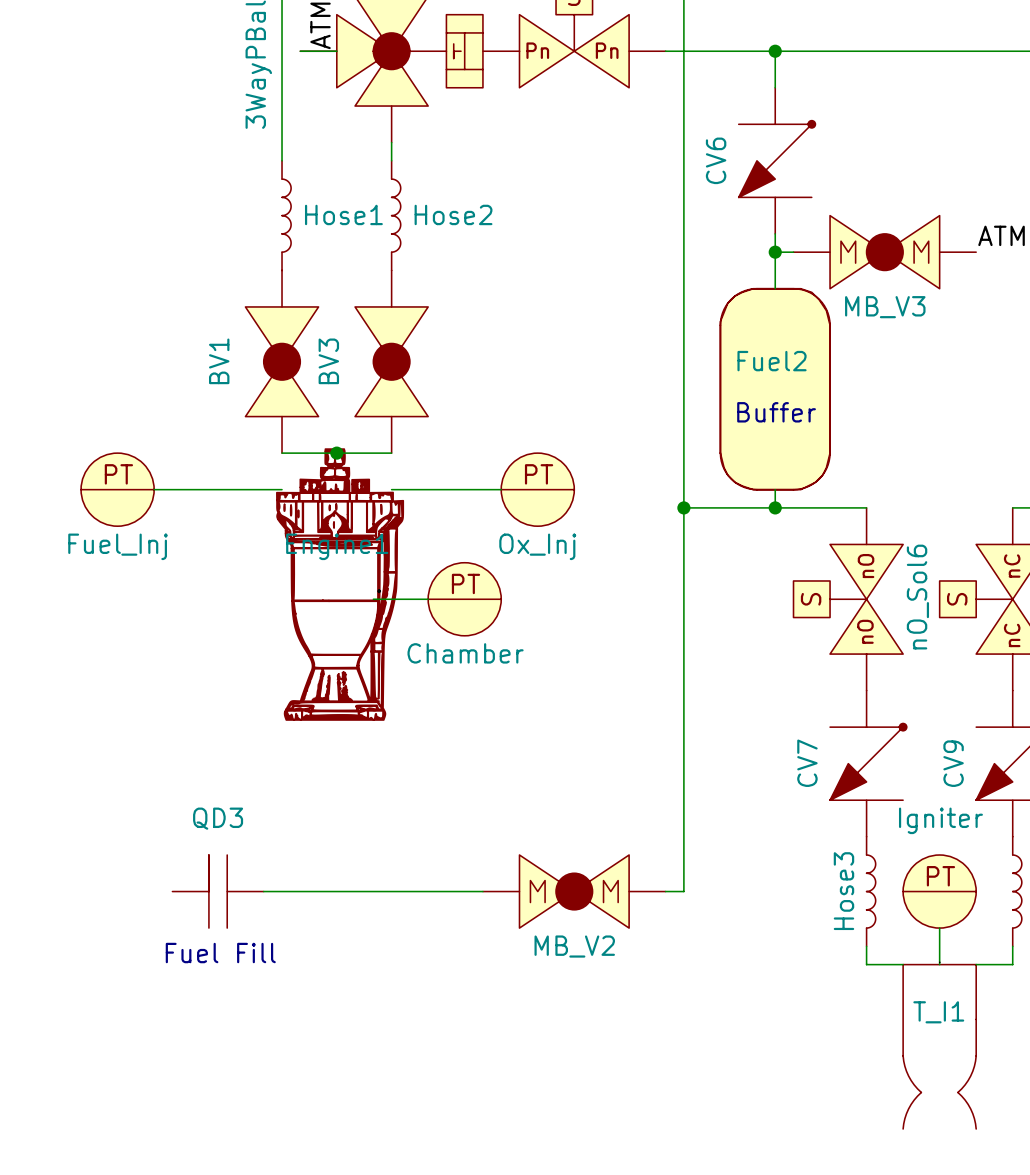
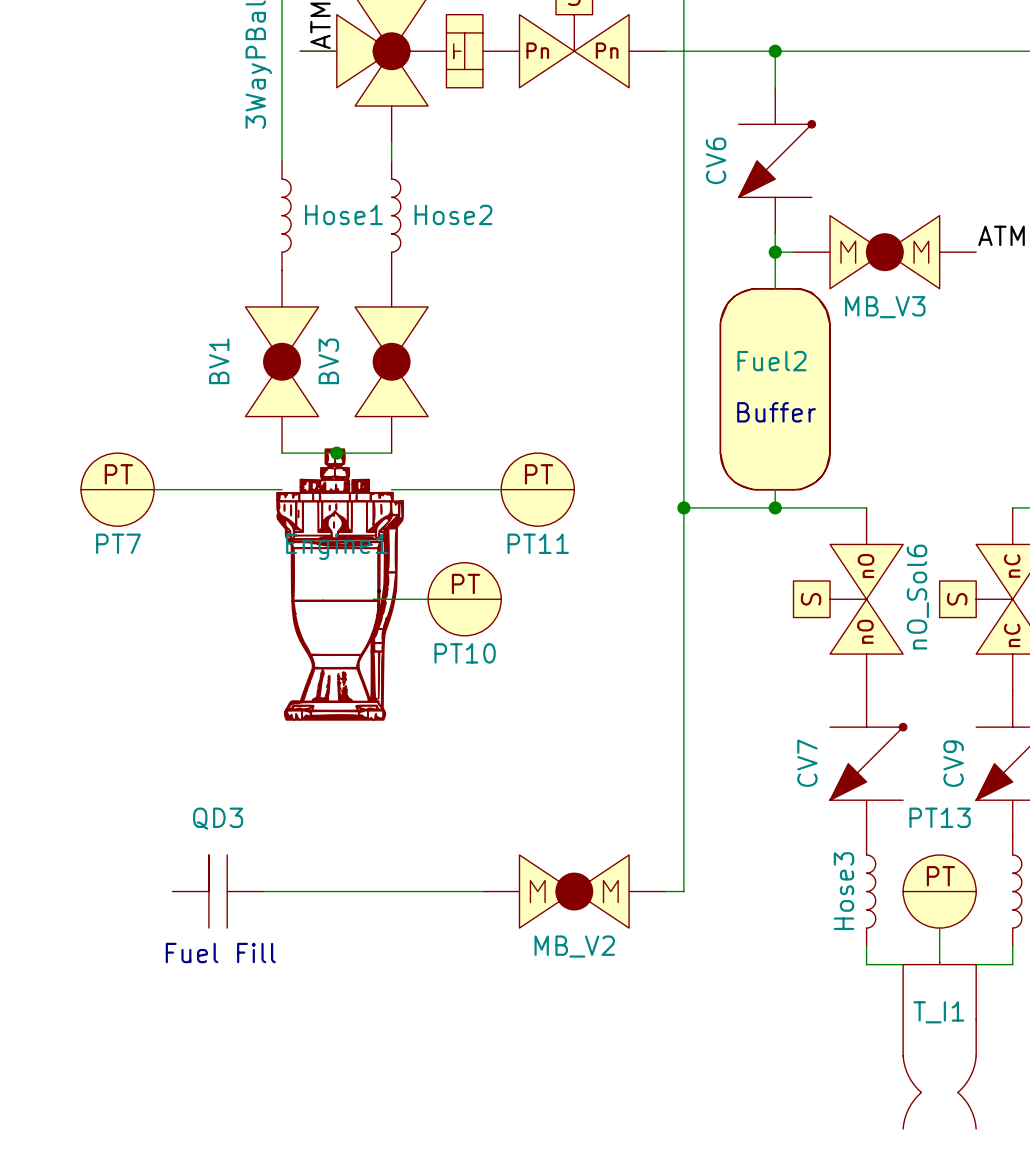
Fuel_Inj name: Fuel_Inj (118, 546) -> PT7 (118, 543)
Ox_Inj name: Ox_Inj (537, 546) -> PT11 (538, 543)
Chamber name: Chamber (465, 653) -> PT10 (465, 653)
Igniter name: Igniter (940, 820) -> PT13 (940, 817)

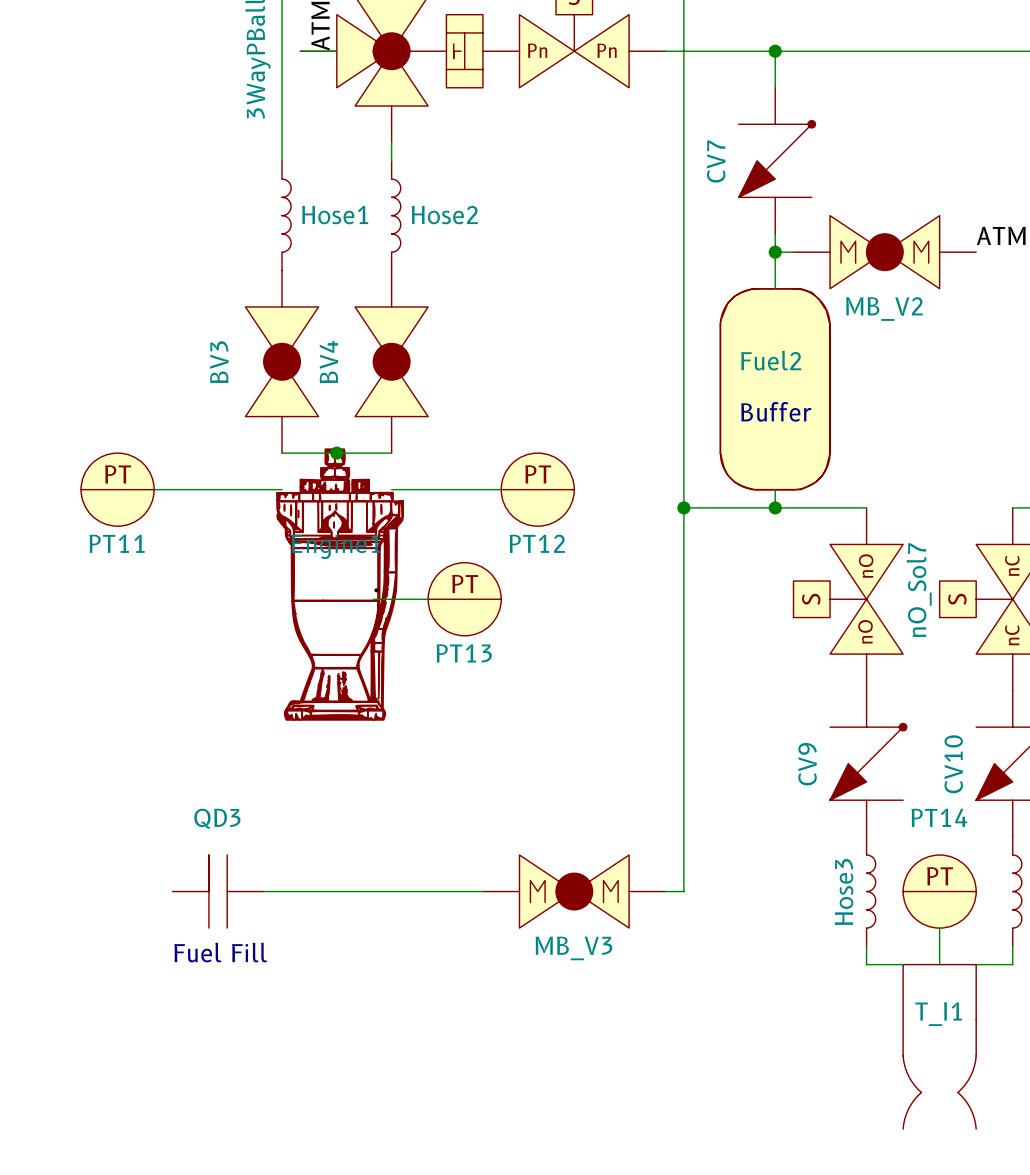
CV6 name: CV6 (716, 160) -> CV7 (716, 161)
MB_V3 name: MB_V3 (885, 307) -> MB_V2 (884, 309)
BV1 name: BV1 (219, 361) -> BV3 (219, 362)
BV3 name: BV3 (328, 361) -> BV4 (328, 362)
PT7 name: PT7 (118, 543) -> PT11 (117, 543)
PT11 name: PT11 (538, 543) -> PT12 (537, 543)
nO_Sol6 name: nO_Sol6 (917, 597) -> nO_Sol7 (919, 590)
PT10 name: PT10 (465, 653) -> PT13 (464, 653)
CV7 name: CV7 (807, 763) -> CV9 (807, 764)
CV9 name: CV9 (953, 763) -> CV10 (953, 764)
PT13 name: PT13 (940, 817) -> PT14 (939, 817)
MB_V2 name: MB_V2 (574, 946) -> MB_V3 (573, 948)

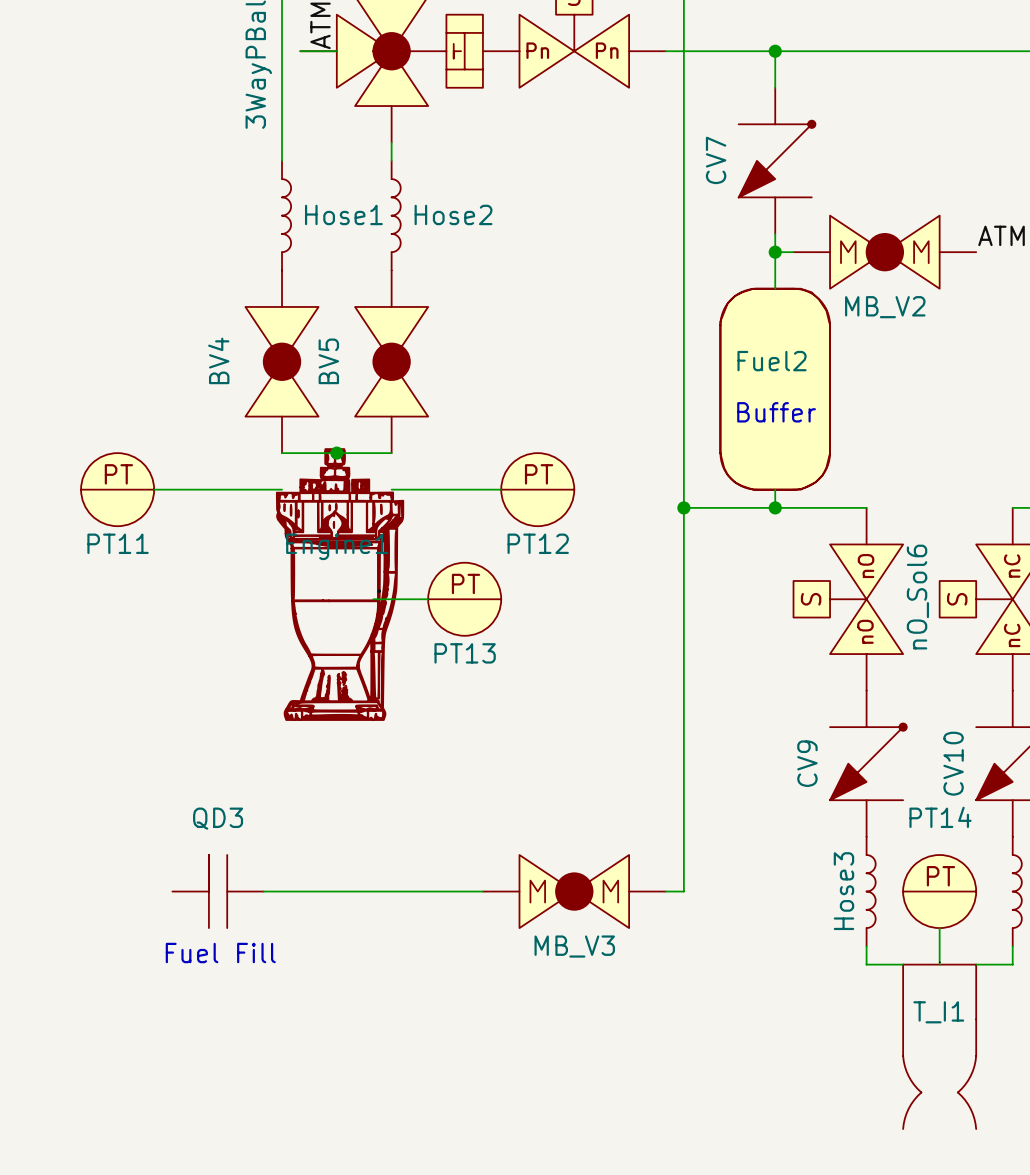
BV3 name: BV3 (219, 362) -> BV4 (218, 360)
BV4 name: BV4 (328, 362) -> BV5 (328, 361)
nO_Sol7 name: nO_Sol7 (919, 590) -> nO_Sol6 (917, 597)

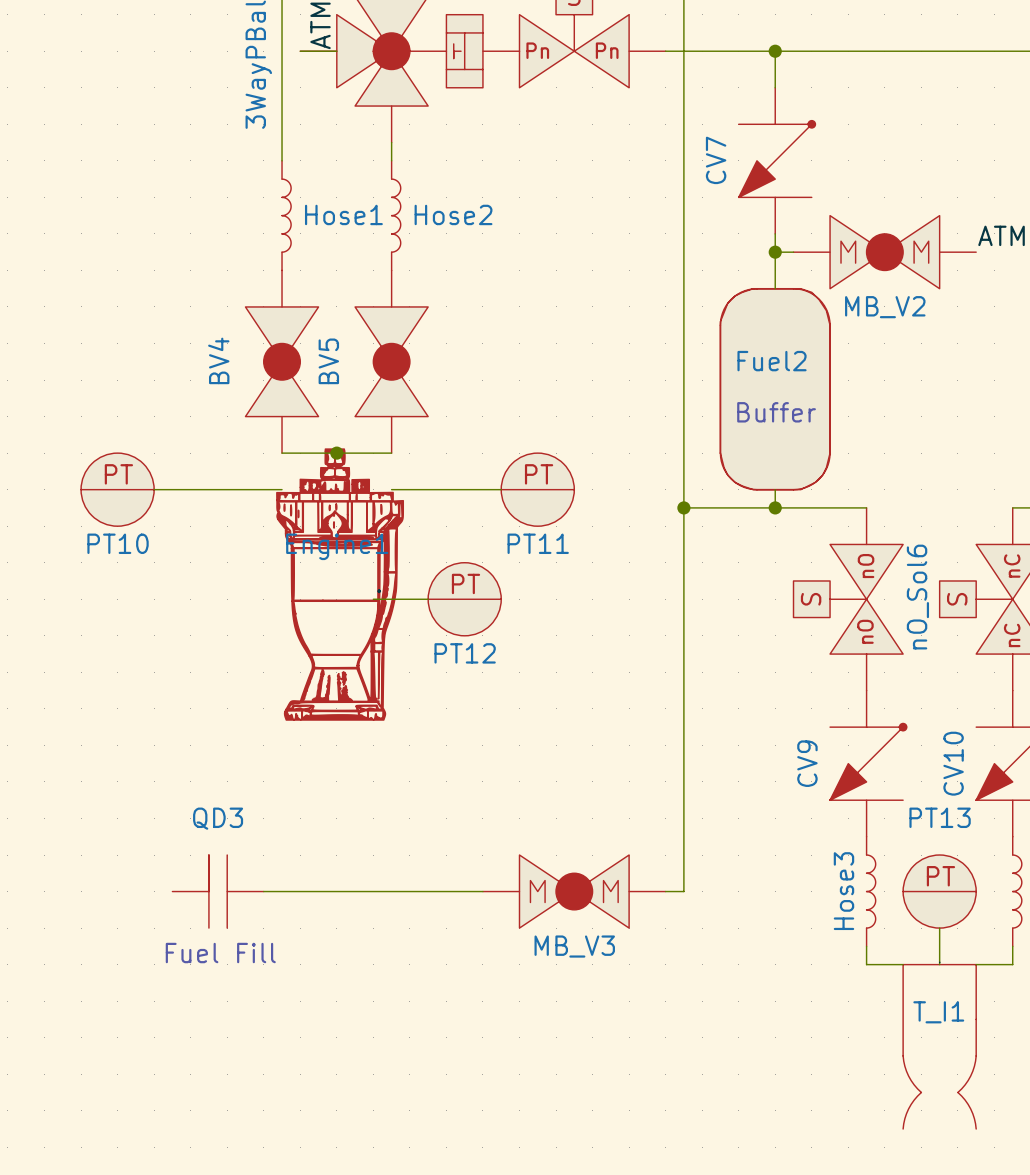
PT11 name: PT11 (118, 543) -> PT10 (118, 543)
PT12 name: PT12 (538, 543) -> PT11 (538, 543)
PT13 name: PT13 (465, 653) -> PT12 (465, 653)
PT14 name: PT14 (940, 817) -> PT13 (940, 817)

